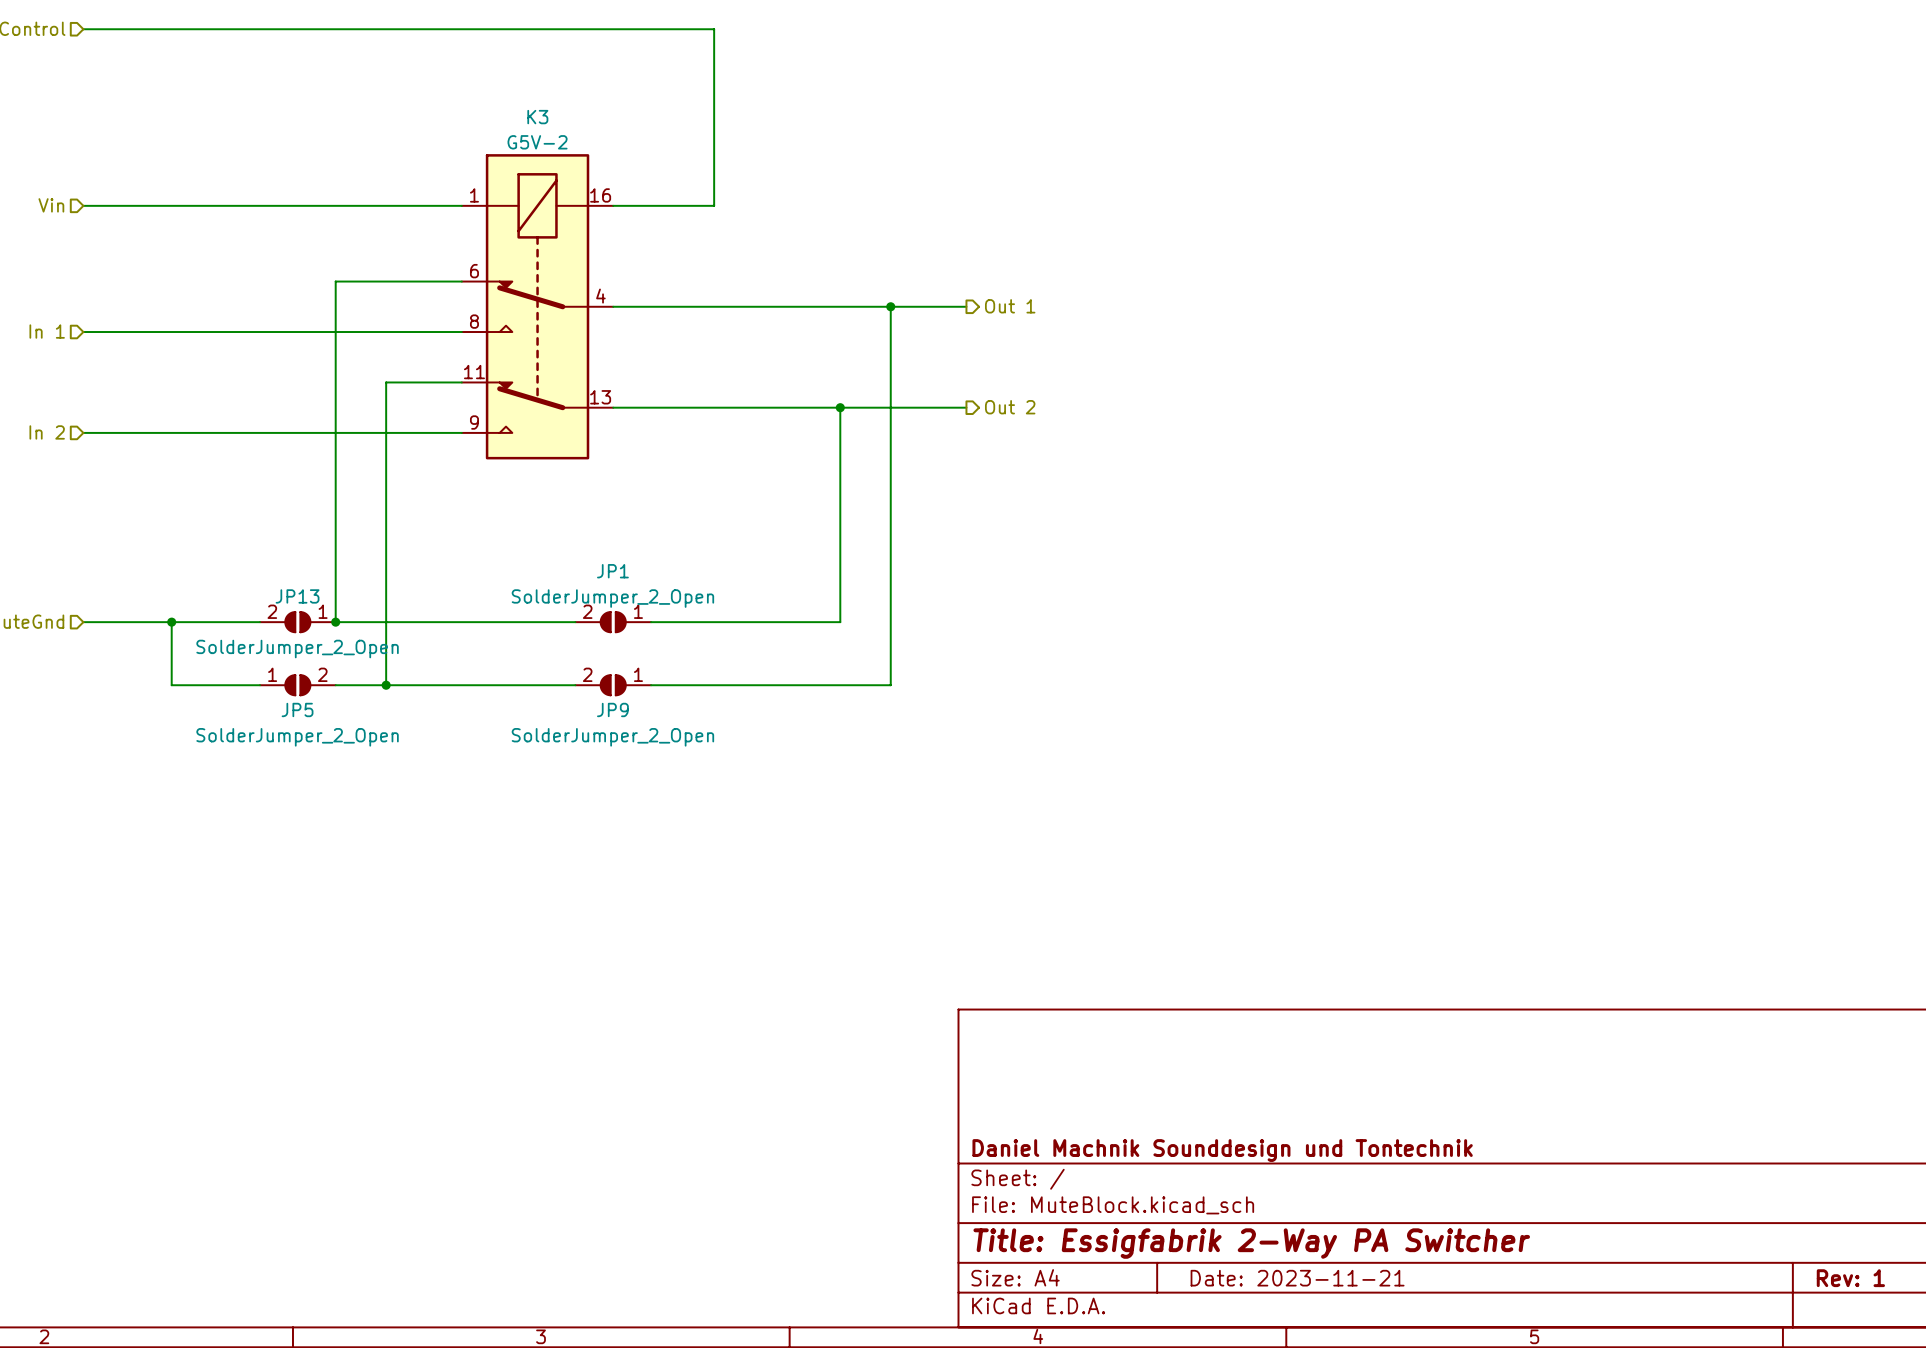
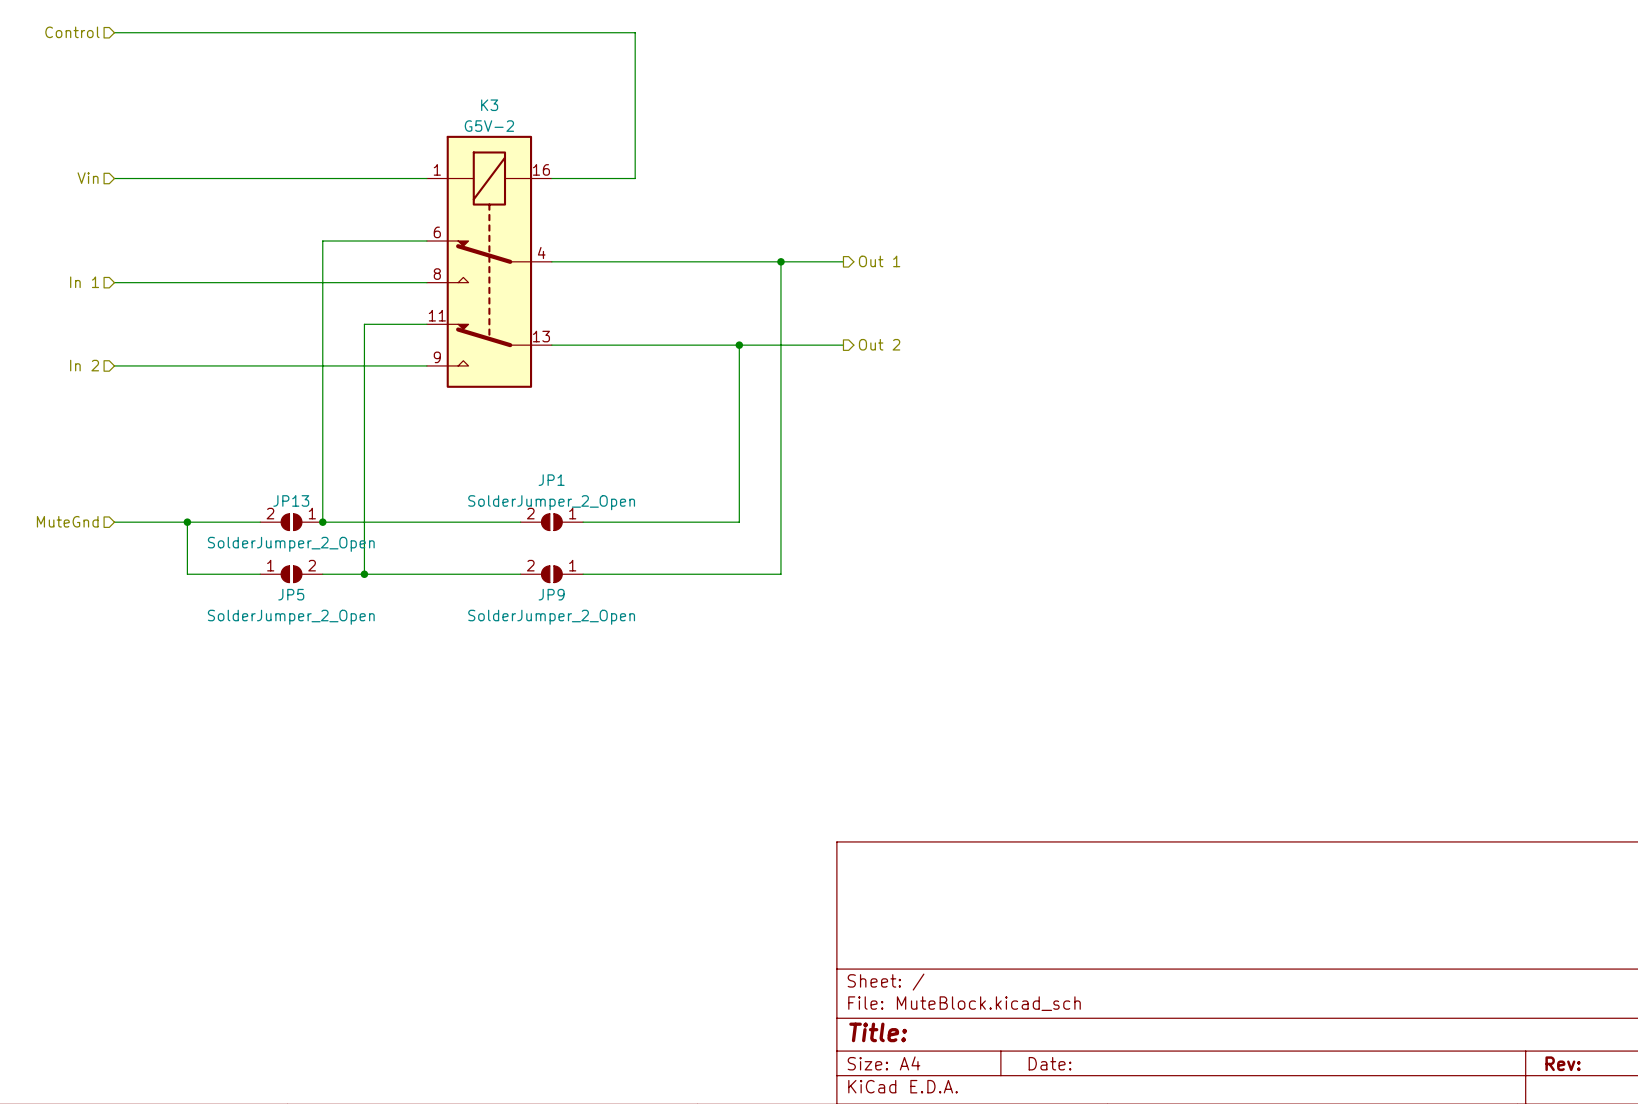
title block: Daniel Machnik Sounddesign und Tontechnik (1222, 1150) -> none
title block: Title: Essigfabrik 2-Way PA Switcher (1251, 1243) -> Title: (878, 1032)
title block: Date: 2023-11-21 (1297, 1278) -> Date: (1050, 1063)
title block: Rev: 1 (1850, 1278) -> Rev: (1563, 1063)

